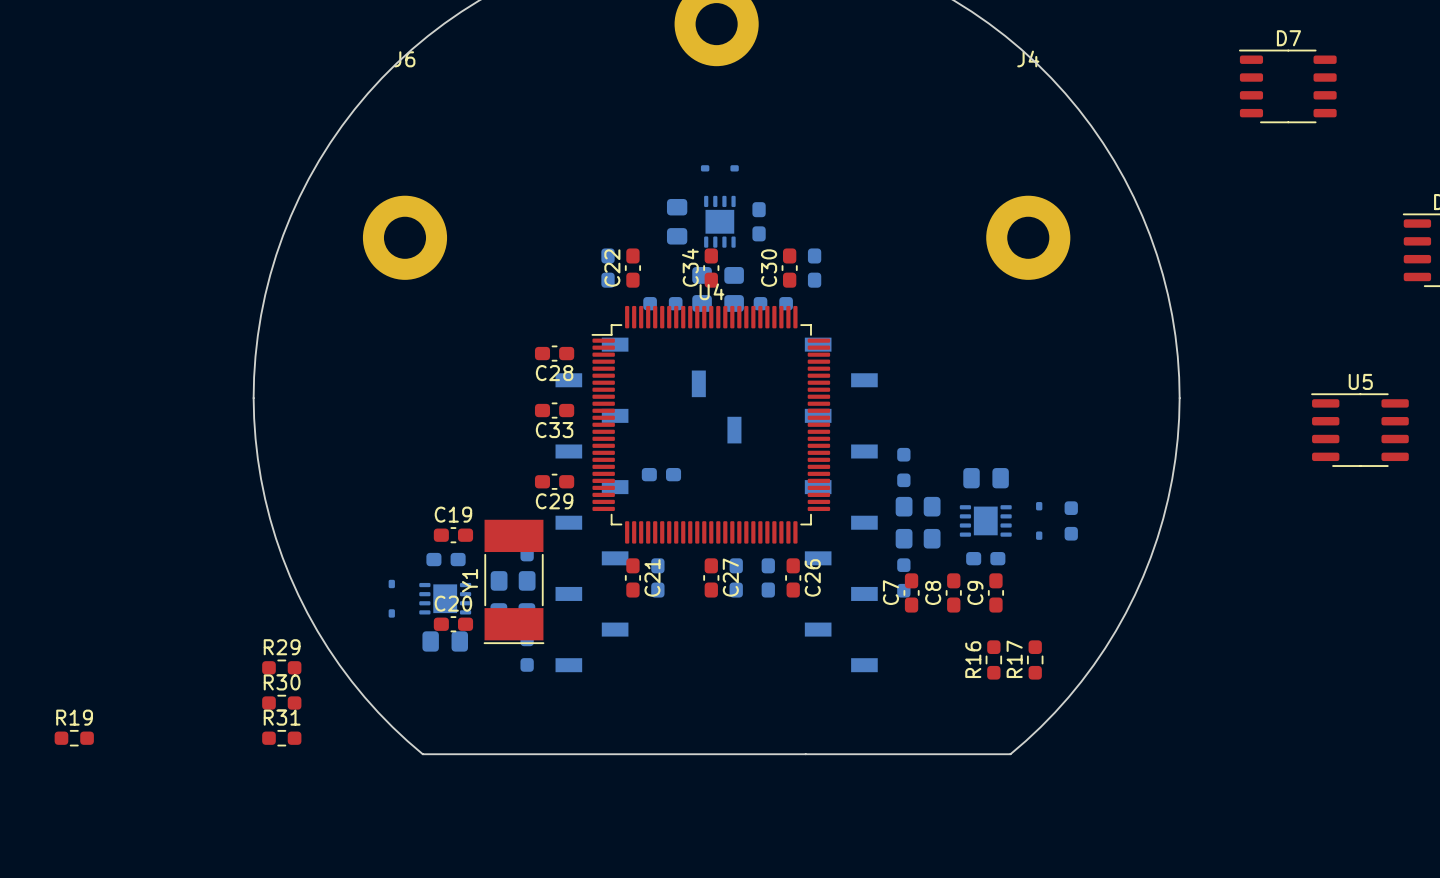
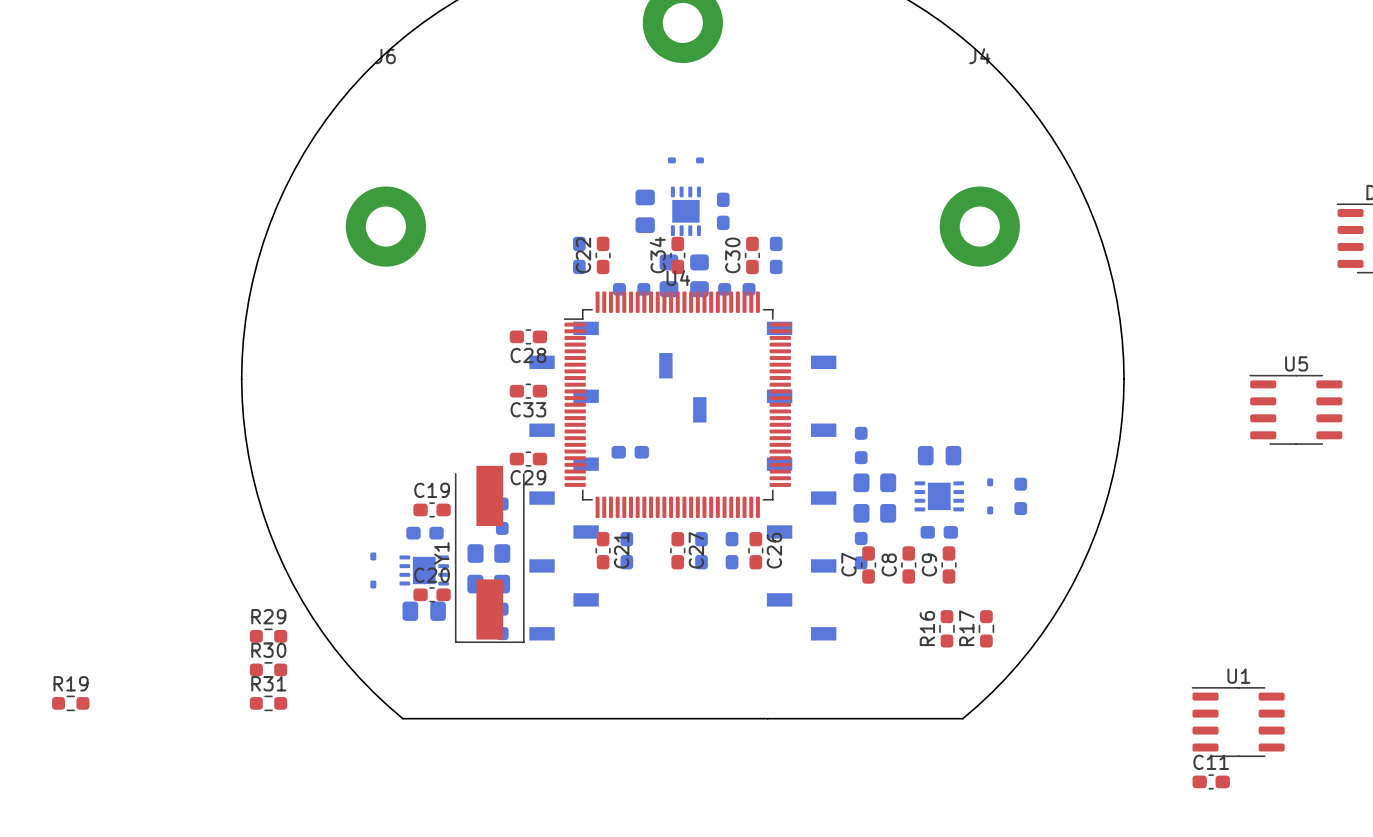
D7: (1287, 86) -> none
Y1 footprint: [483, 519, 545, 645] -> [454, 465, 525, 644]
U1: none -> (1238, 722)
C11: none -> (1211, 781)

